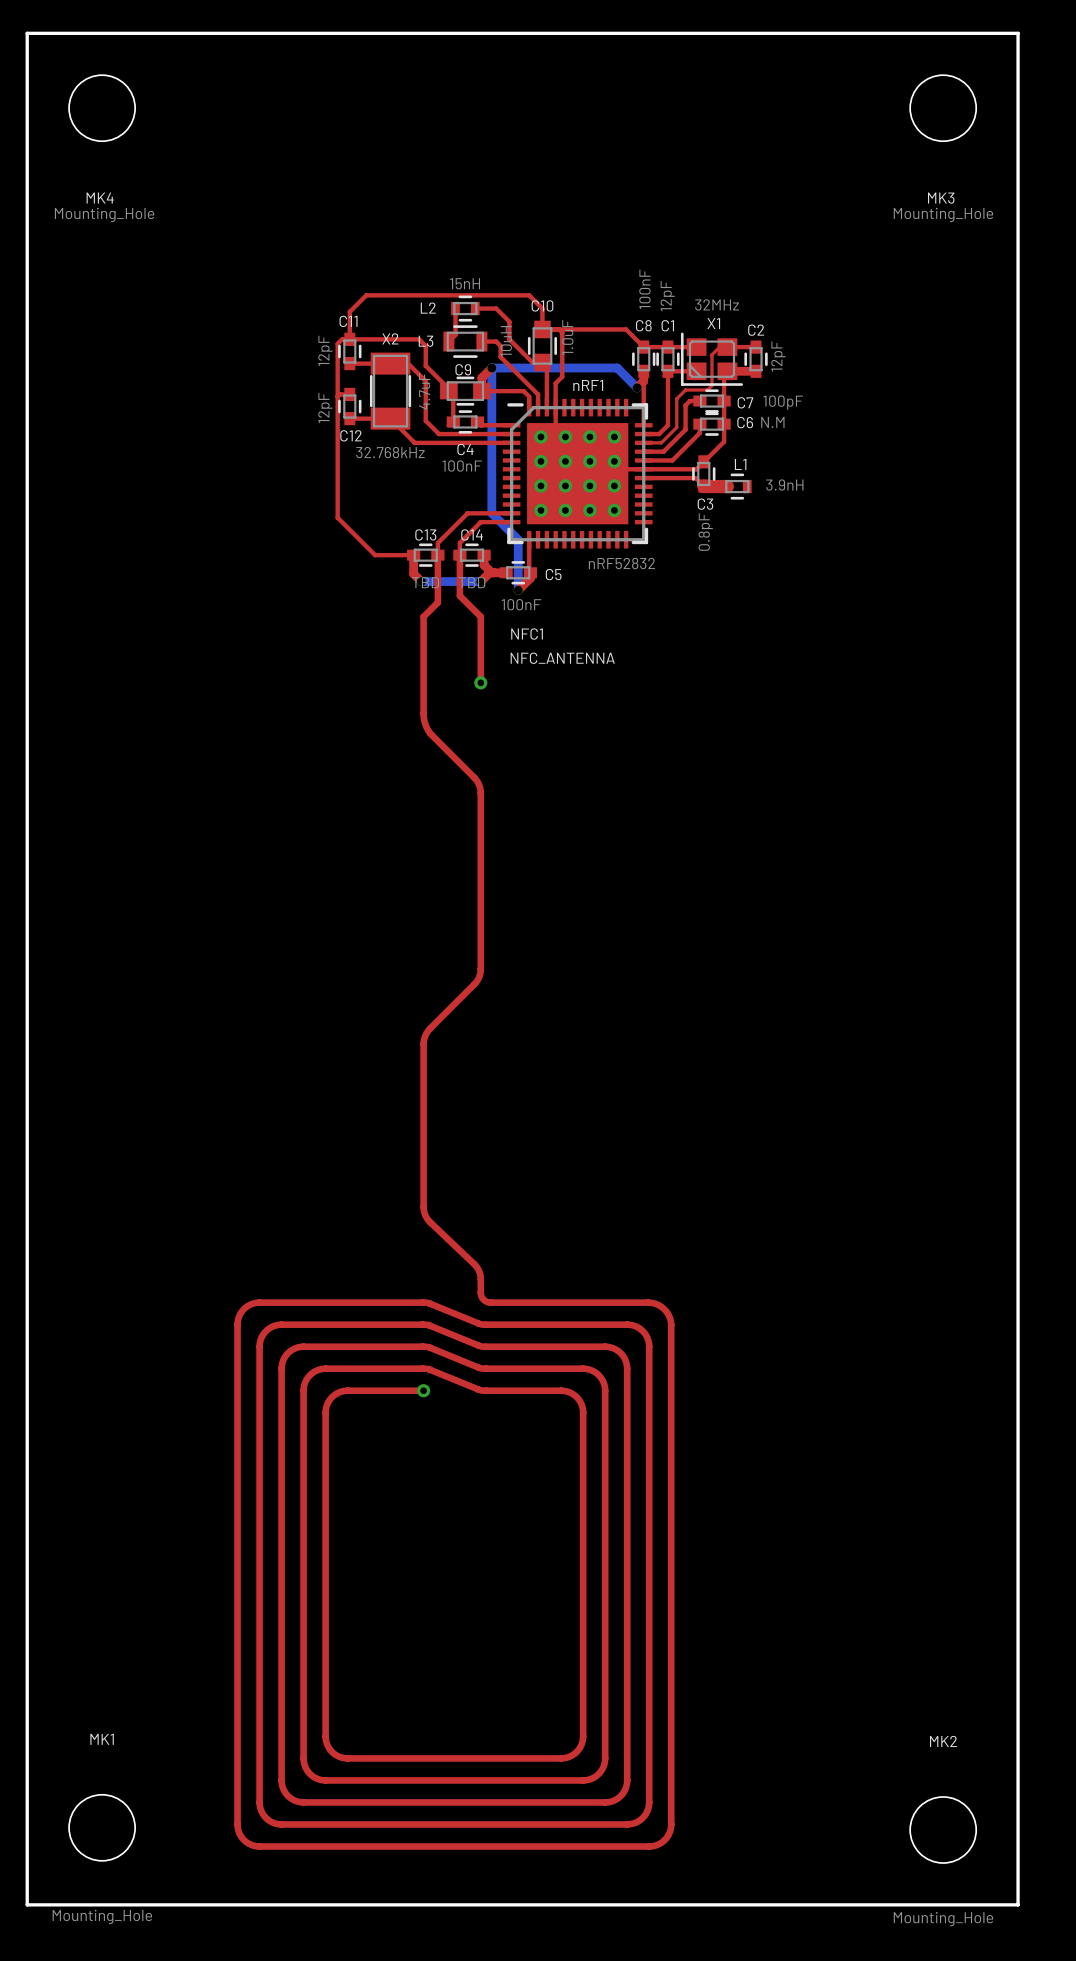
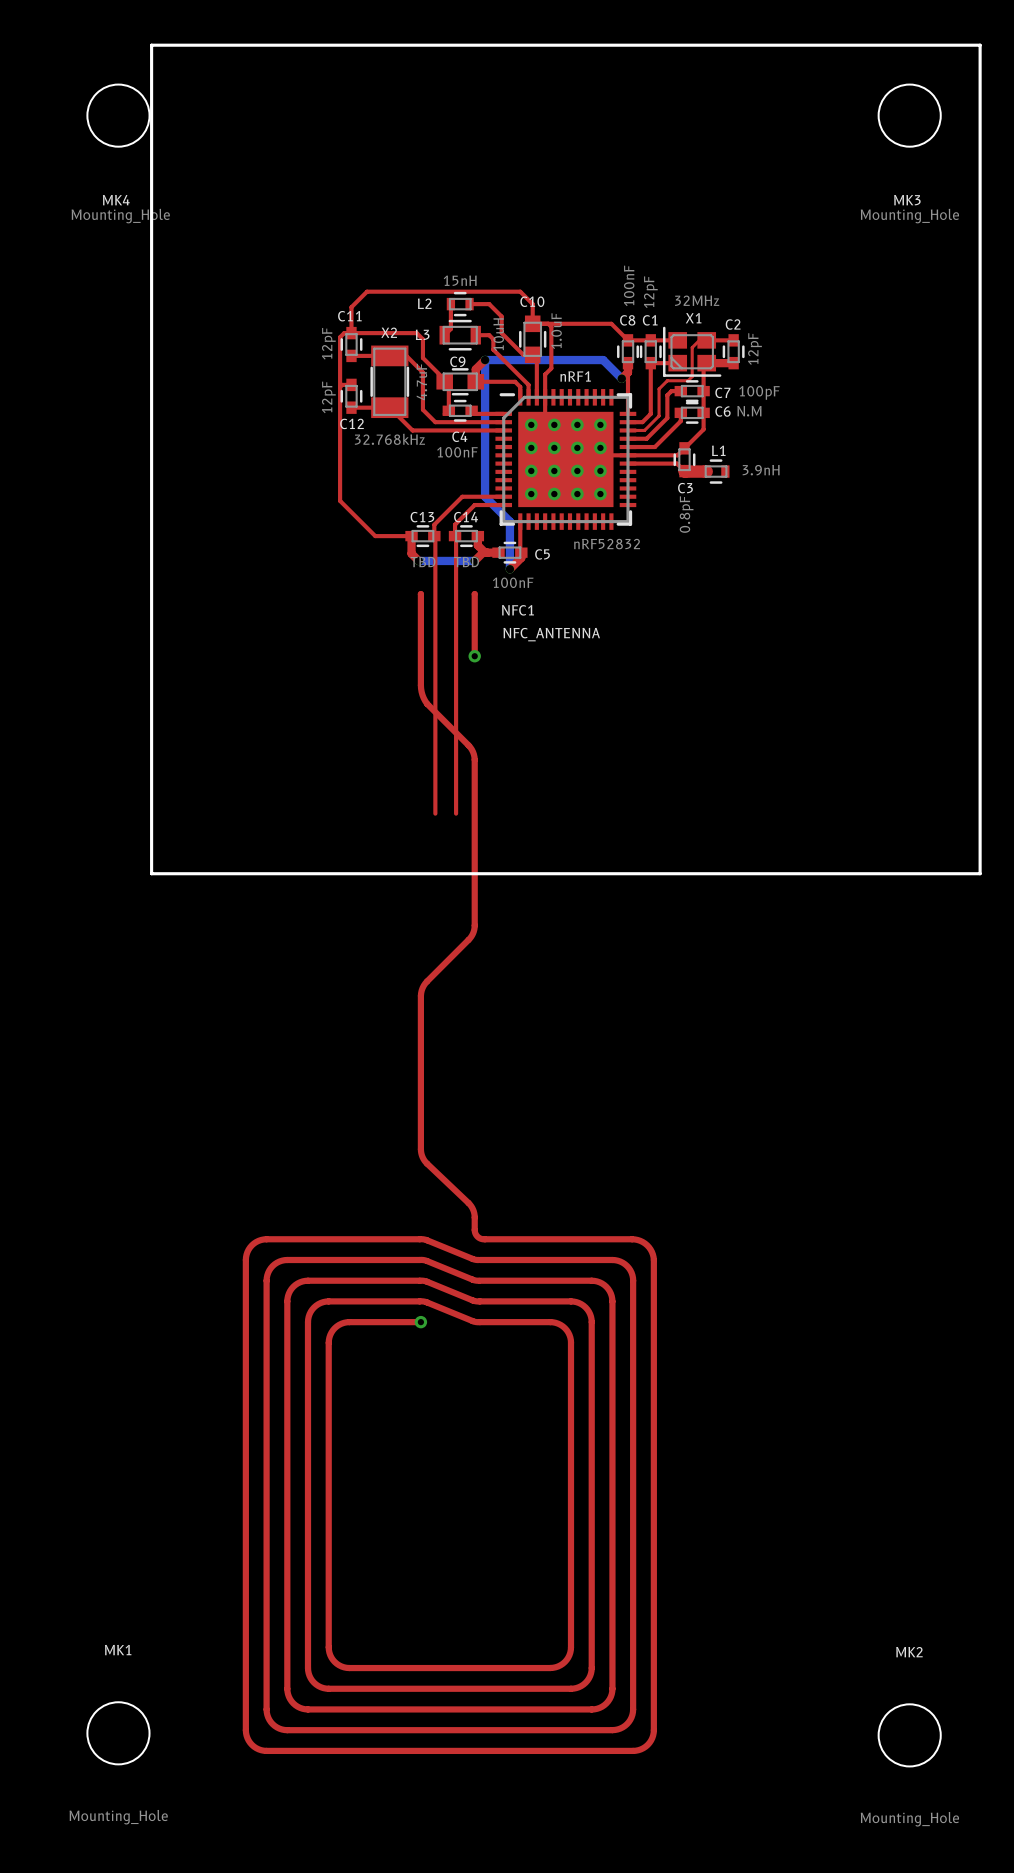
board edge: (137, 33) (27, 33) (27, 1904) (1018, 1904) (1018, 914) -> (151, 45) (151, 873) (980, 873)
top track: (437, 555) (437, 602) (423, 616) -> none
top track: (459, 555) (459, 595) (480, 616) -> none
top track: none -> (435, 537) (435, 813)
top track: none -> (456, 537) (456, 813)

